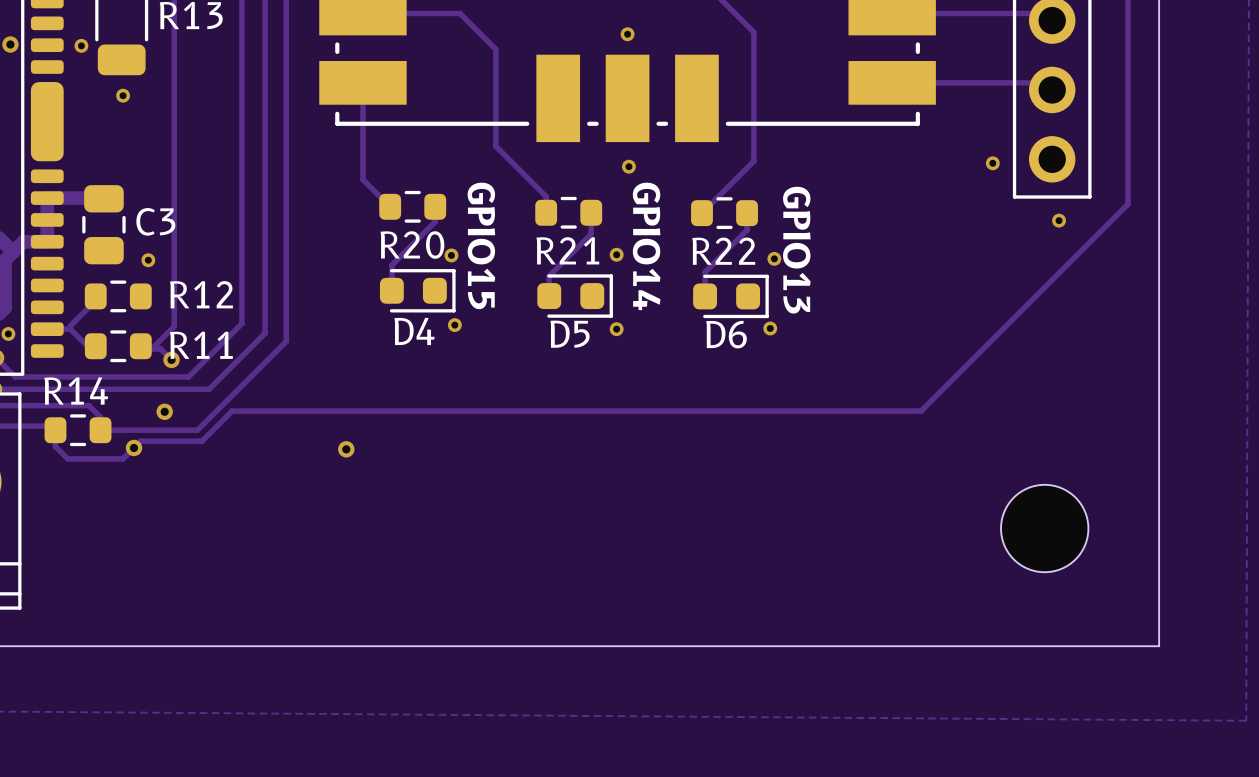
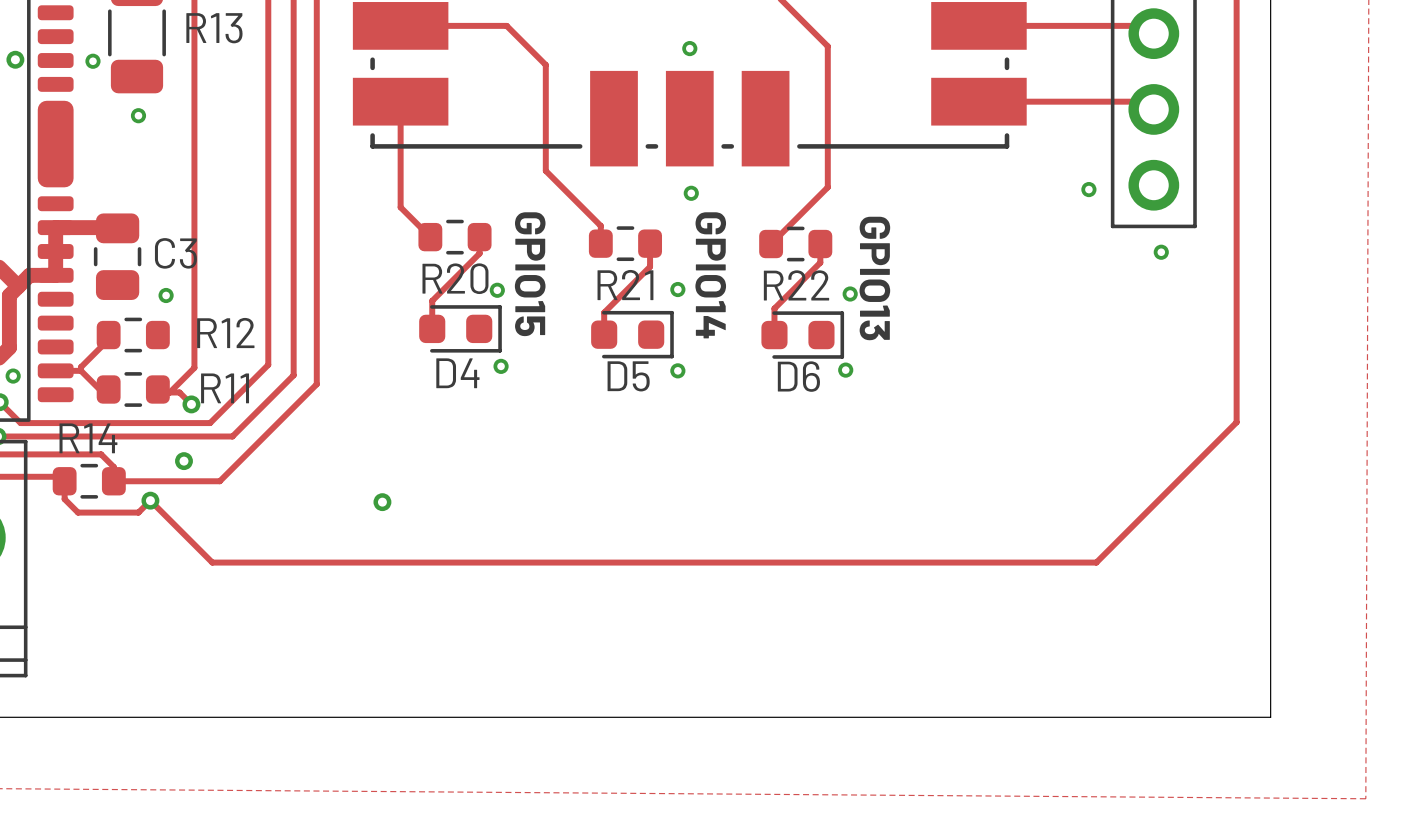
track: (1128, 204) (921, 411) (232, 411) (202, 441) (140, 441) (133, 447) -> (1236, 234) (1236, 422) (1096, 562) (212, 562) (150, 500)
part: (1044, 528) -> none

